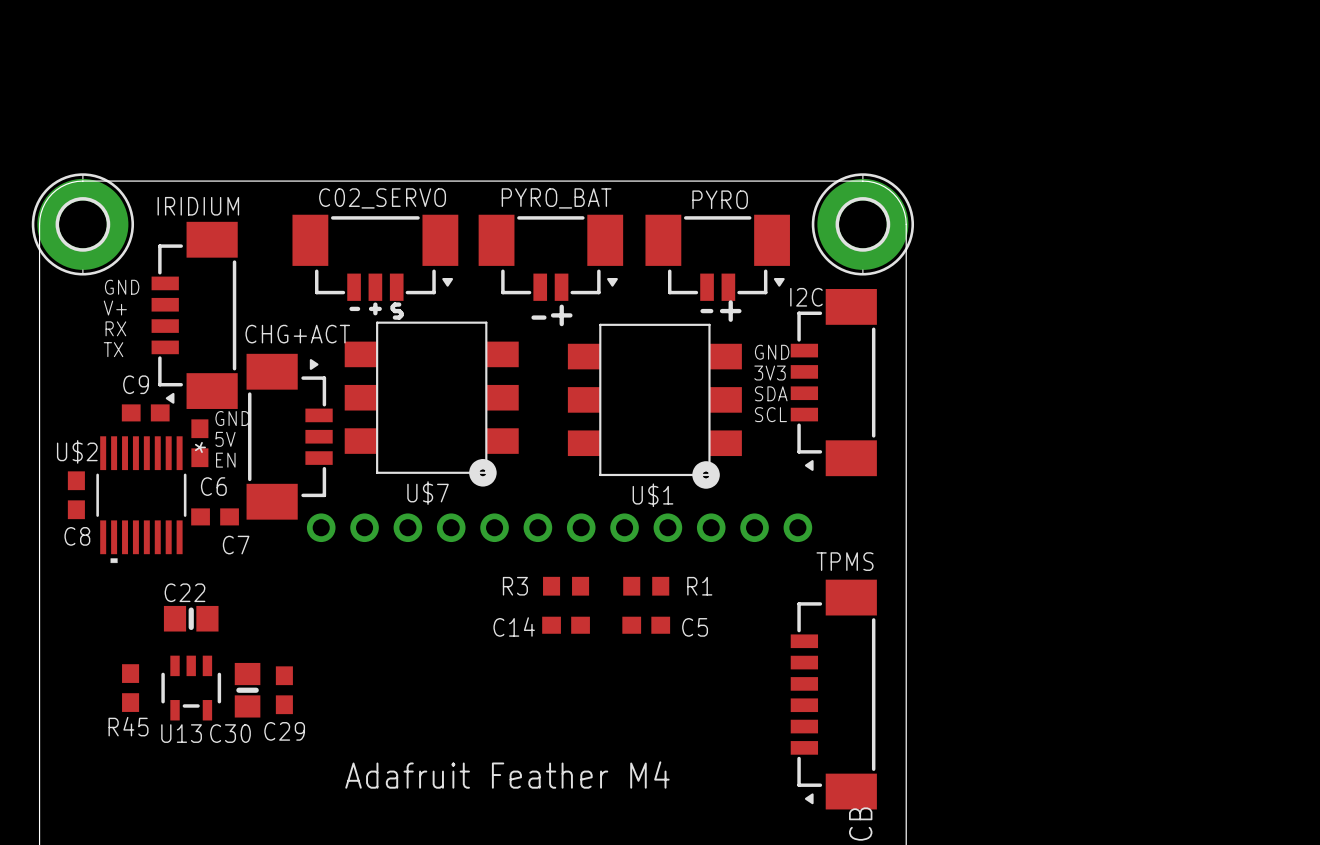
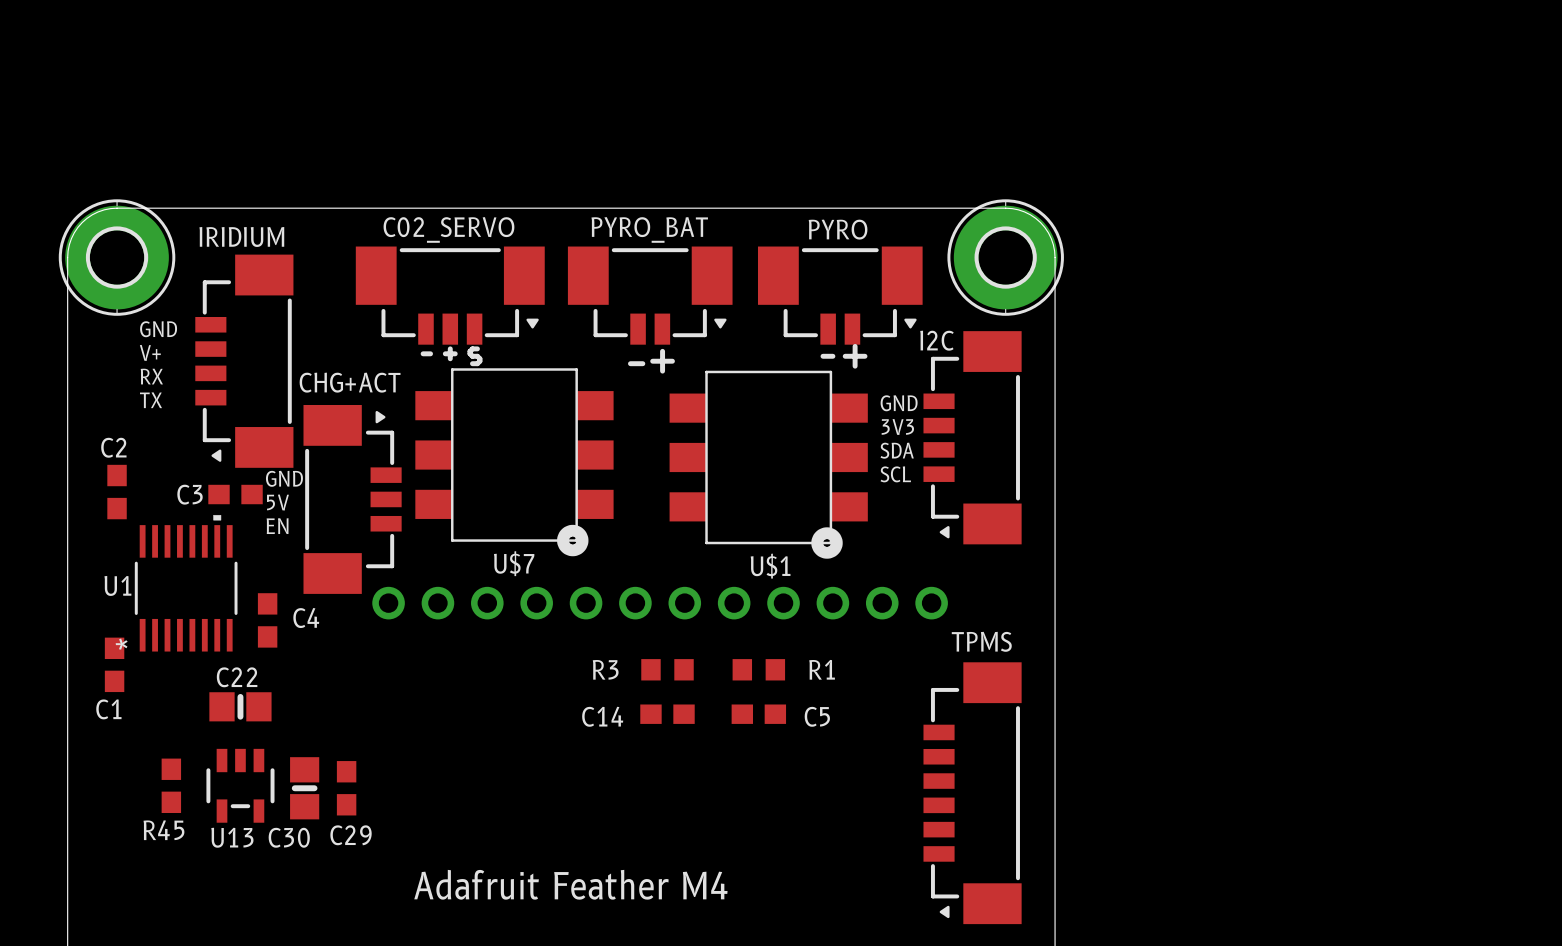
C9: (145, 412) -> none
C2: none -> (117, 492)
C3: none -> (235, 494)
C6: (199, 443) -> none
C8: (76, 495) -> none
U$2: (141, 499) -> none
U1: none -> (186, 583)
C7: (215, 516) -> none
C4: none -> (267, 620)
C1: none -> (114, 664)

